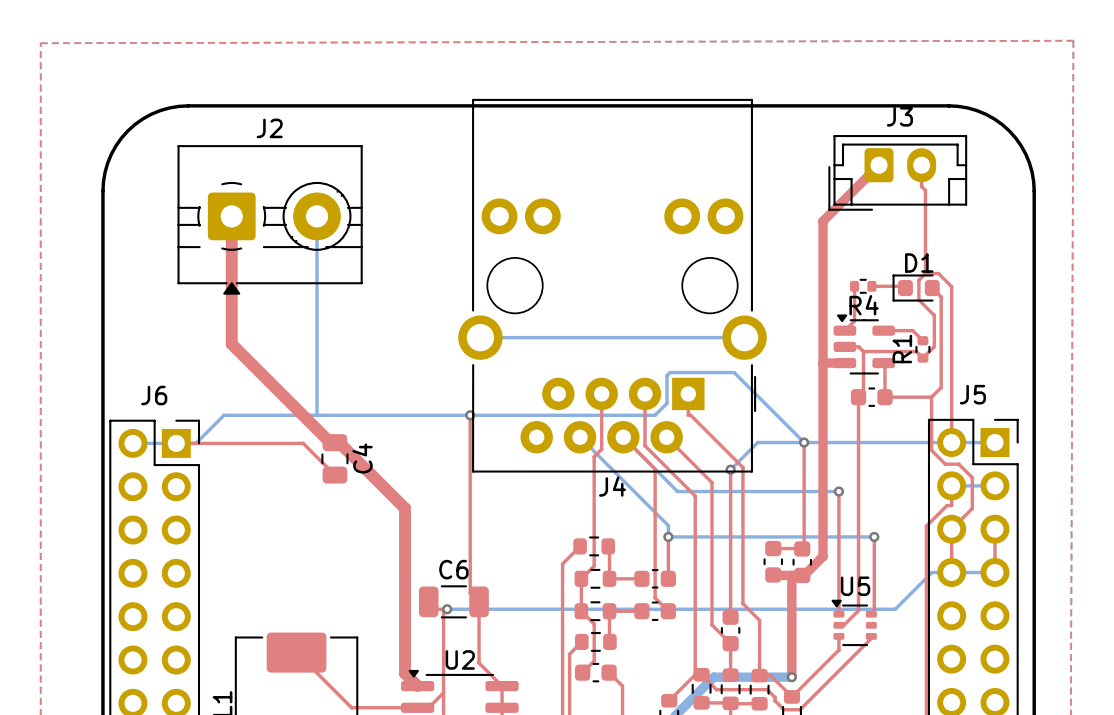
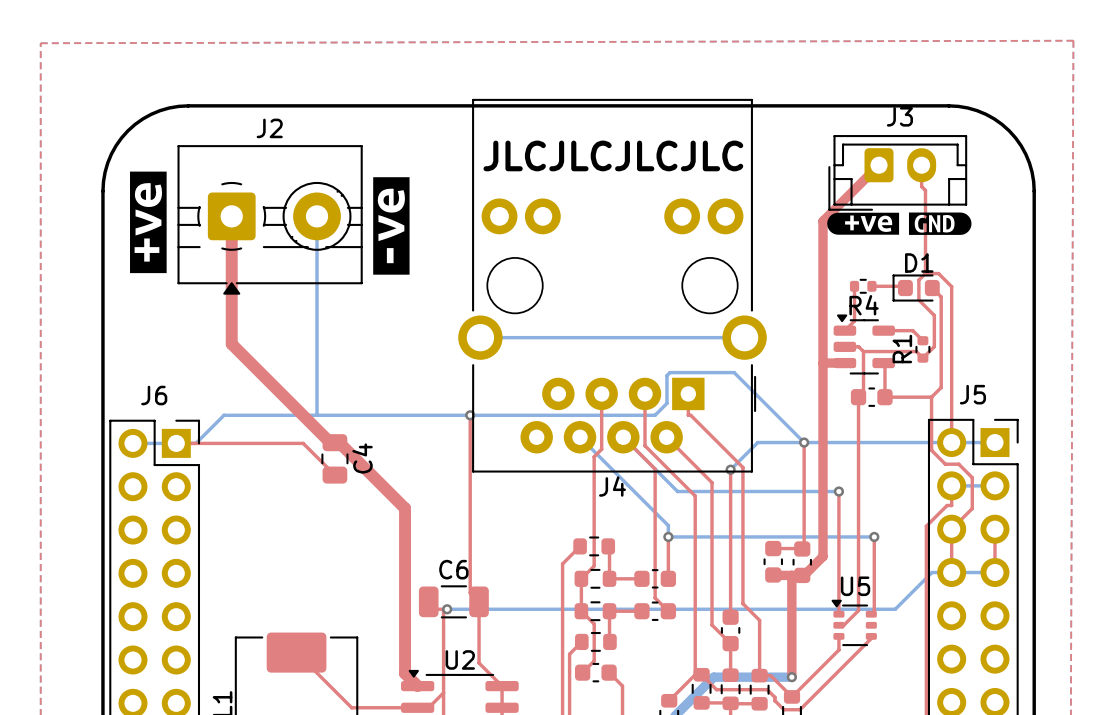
text: none -> JLCJLCJLCJLC (613, 155)
drawing: none -> [130, 171, 167, 274]
drawing: none -> [373, 177, 410, 275]
drawing: none -> [827, 212, 972, 235]

